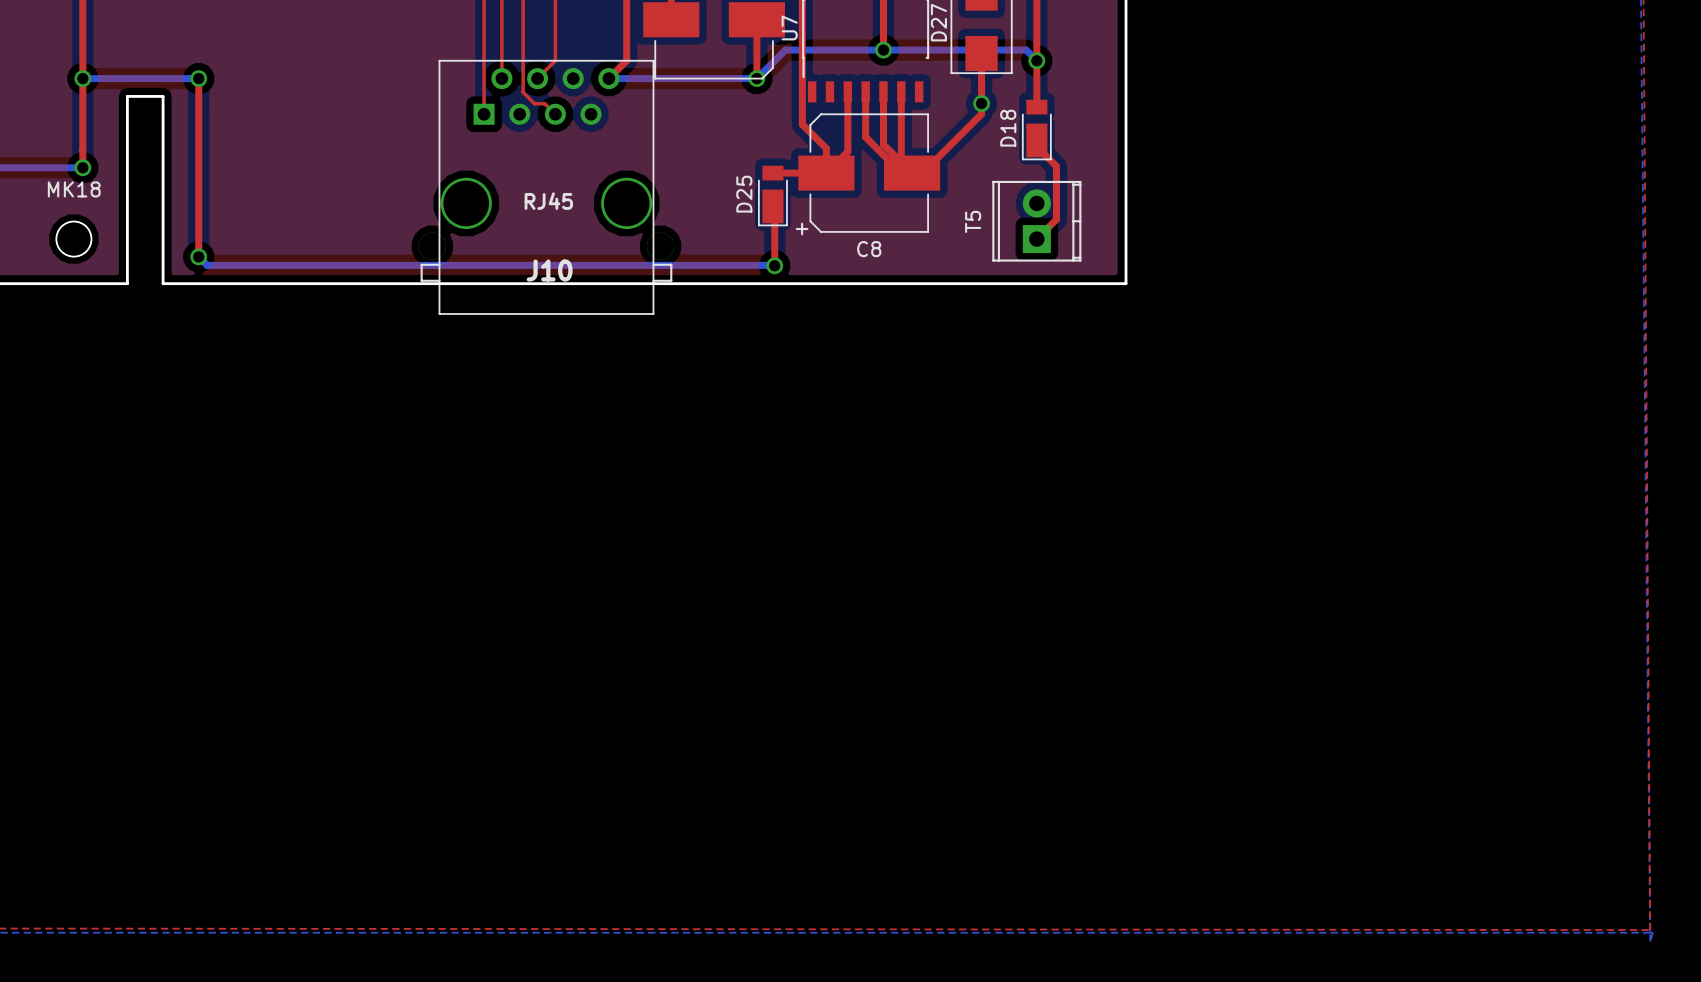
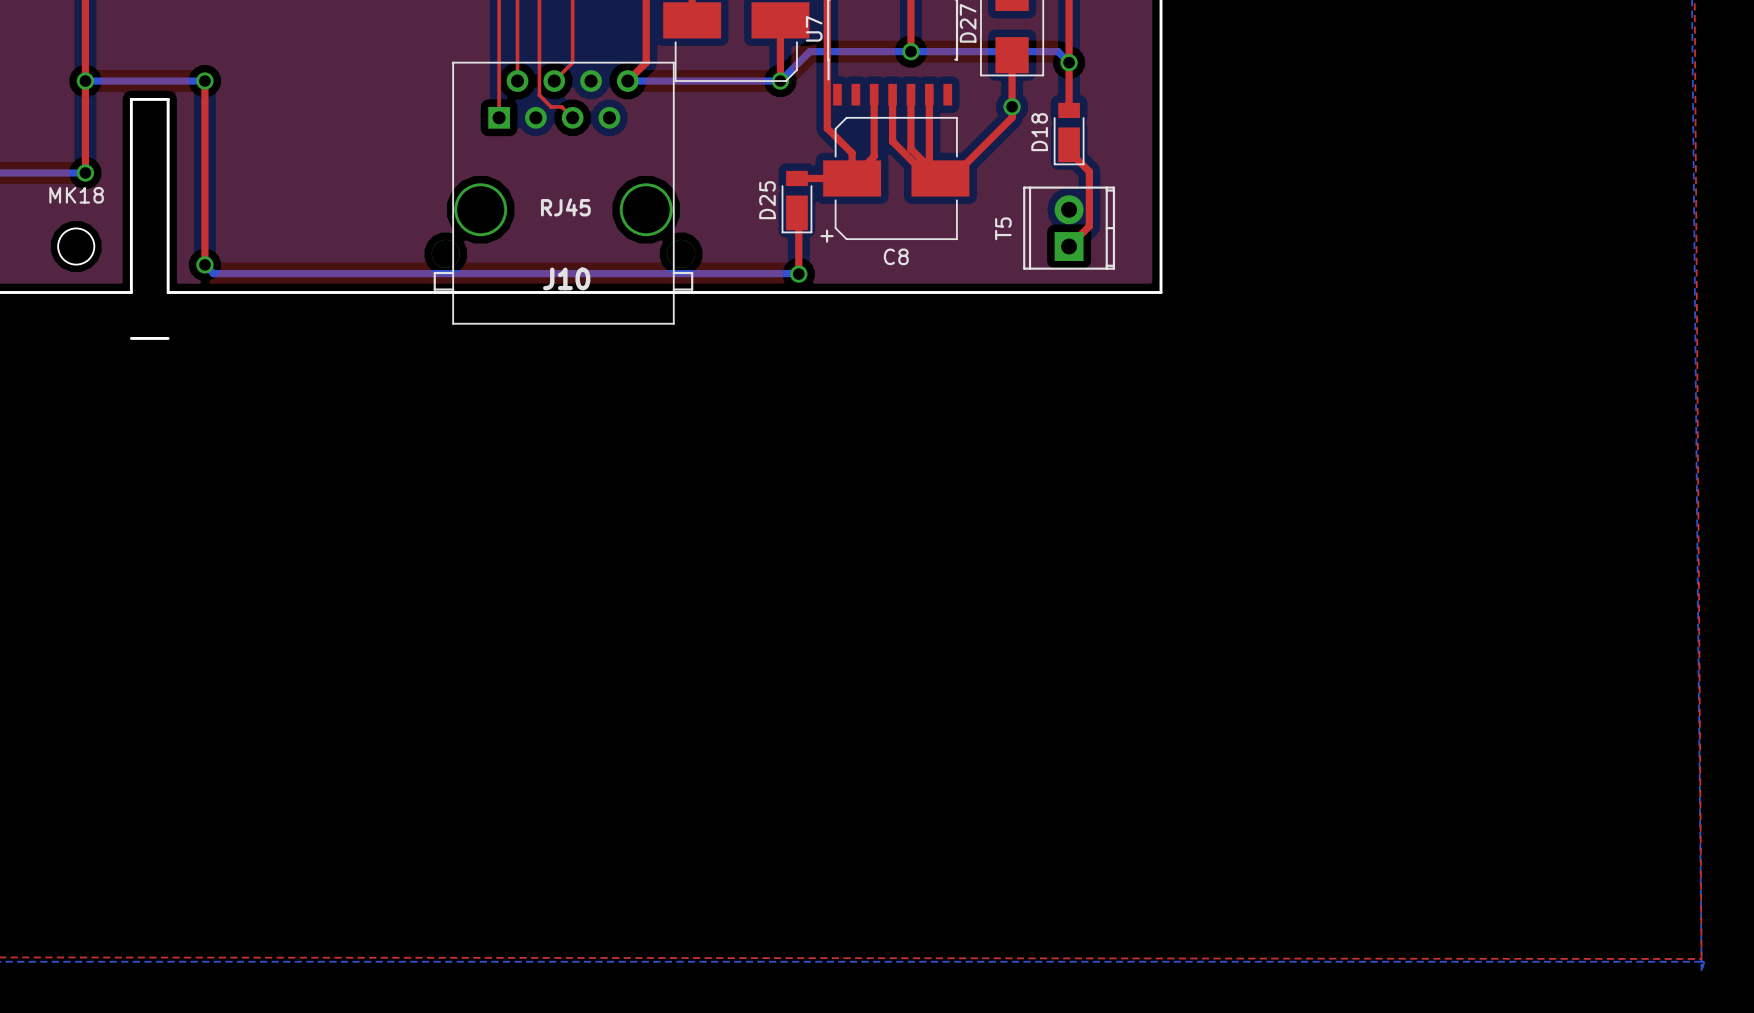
board edge: none -> (131, 338) (168, 338)

